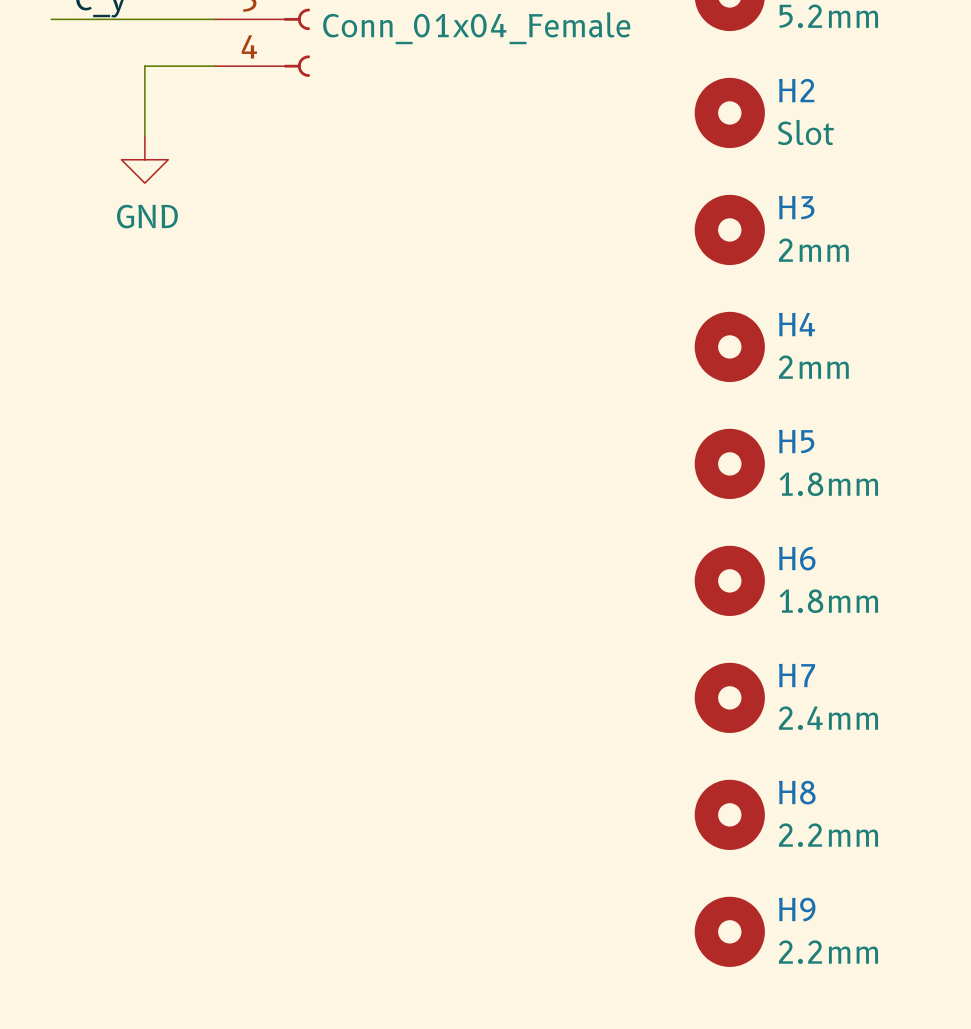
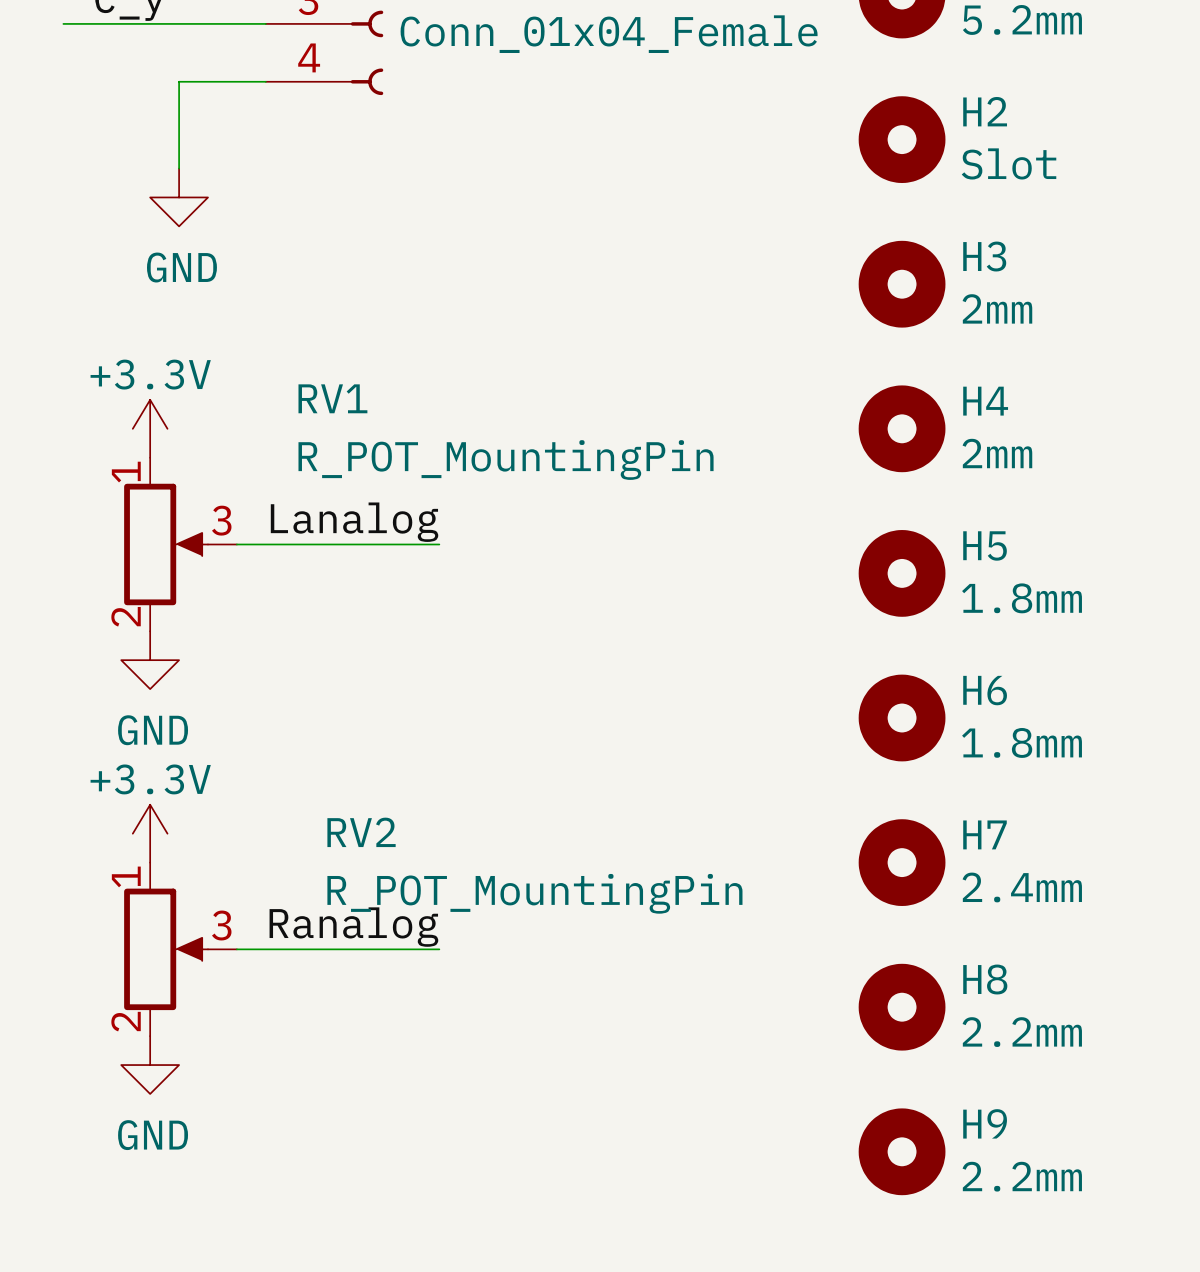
power symbol: none -> +3.3V (150, 428)
label: none -> Lanalog (354, 522)
RV1: none -> R_POT_MountingPin (180, 544)
wire: none -> (236, 544) (439, 544)
power symbol: none -> GND (150, 660)
power symbol: none -> +3.3V (150, 833)
label: none -> Ranalog (353, 927)
RV2: none -> R_POT_MountingPin (180, 949)
wire: none -> (236, 949) (439, 949)
power symbol: none -> GND (150, 1065)

